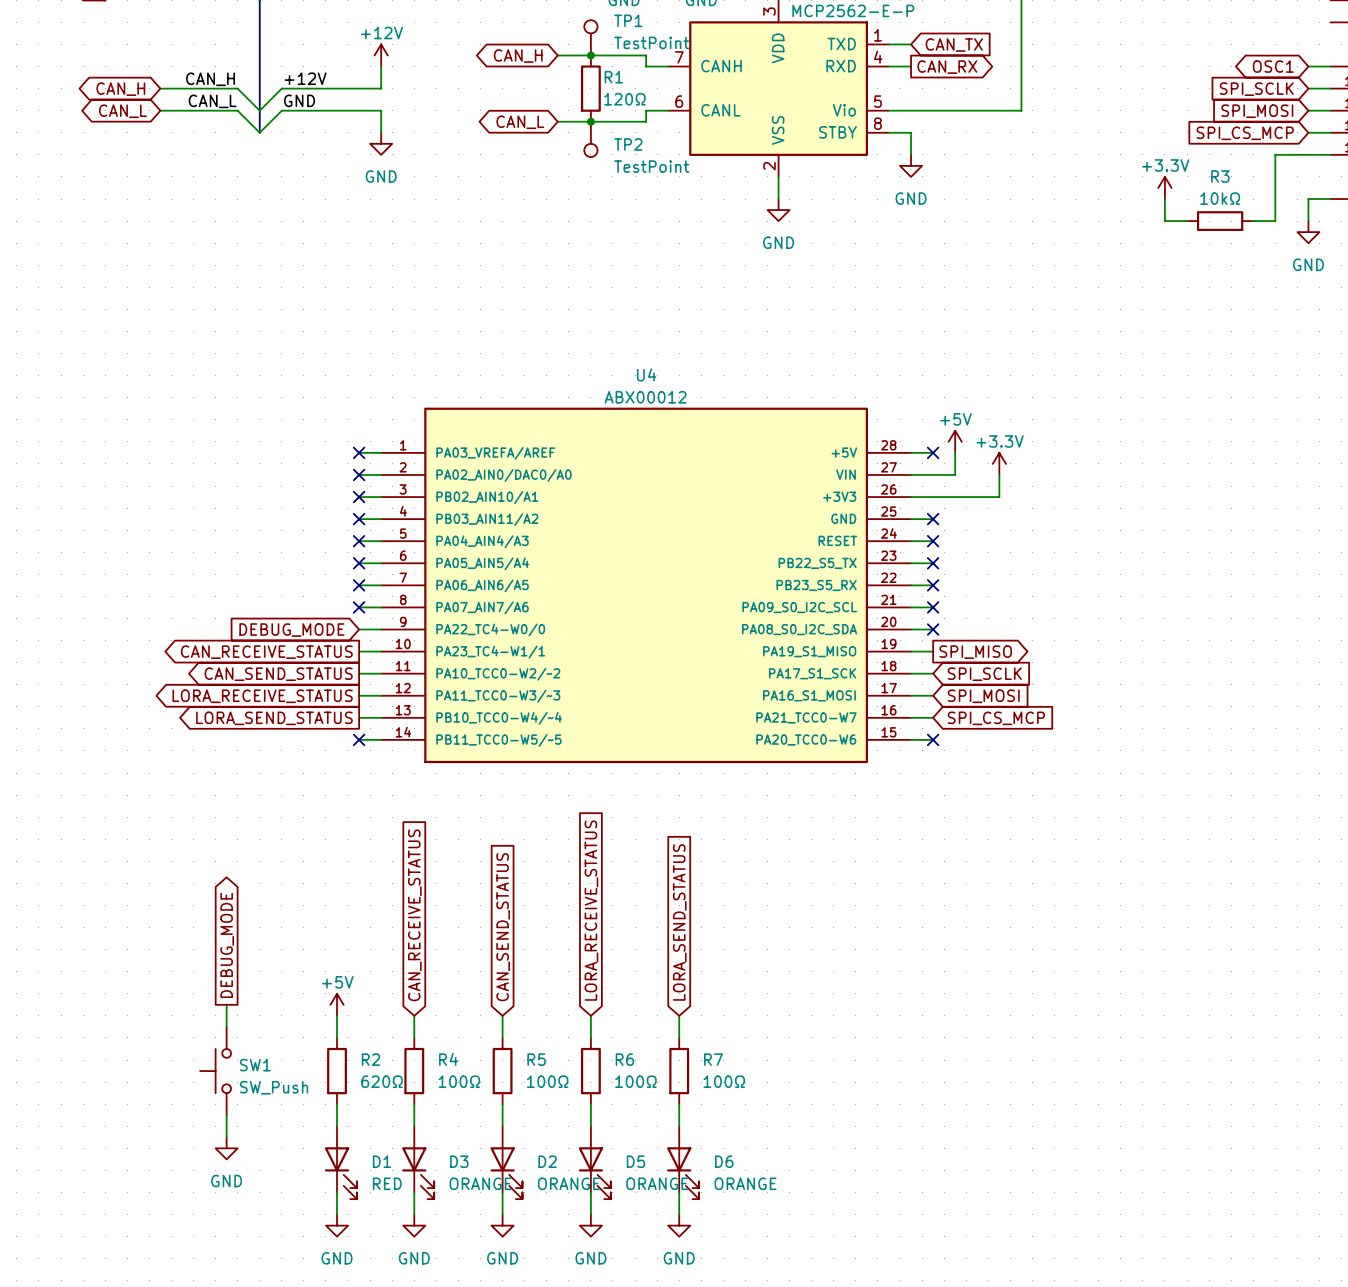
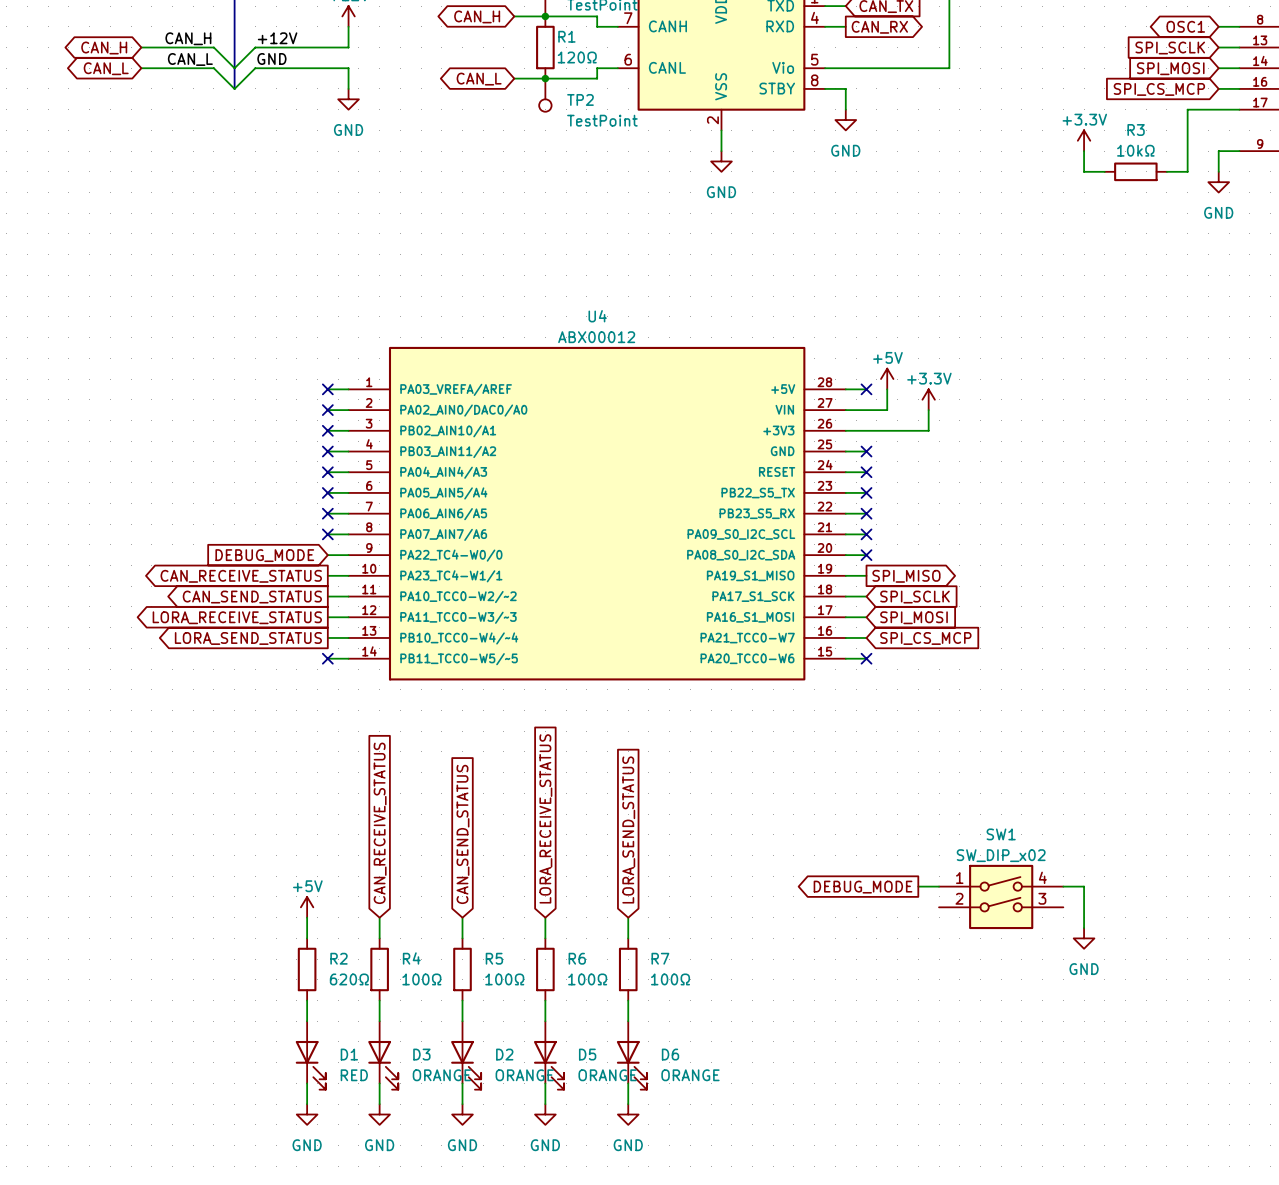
global label: DEBUG_MODE (227, 945) -> none
wire: none -> (918, 886) (939, 886)
wire: none -> (1063, 886) (1084, 886) (1084, 928)
global label: none -> DEBUG_MODE (863, 887)
wire: (226, 1004) (226, 1026) -> none
SW1 symbol: [200, 1026, 232, 1116] -> [939, 864, 1064, 930]
power symbol: none -> GND (1084, 938)
SW1 name position: SW1 (255, 1065) -> SW1 (1001, 834)
SW1 value: SW_Push (274, 1087) -> SW_DIP_x02 (1001, 855)
wire: (226, 1115) (226, 1137) -> none
power symbol: GND (226, 1148) -> none

